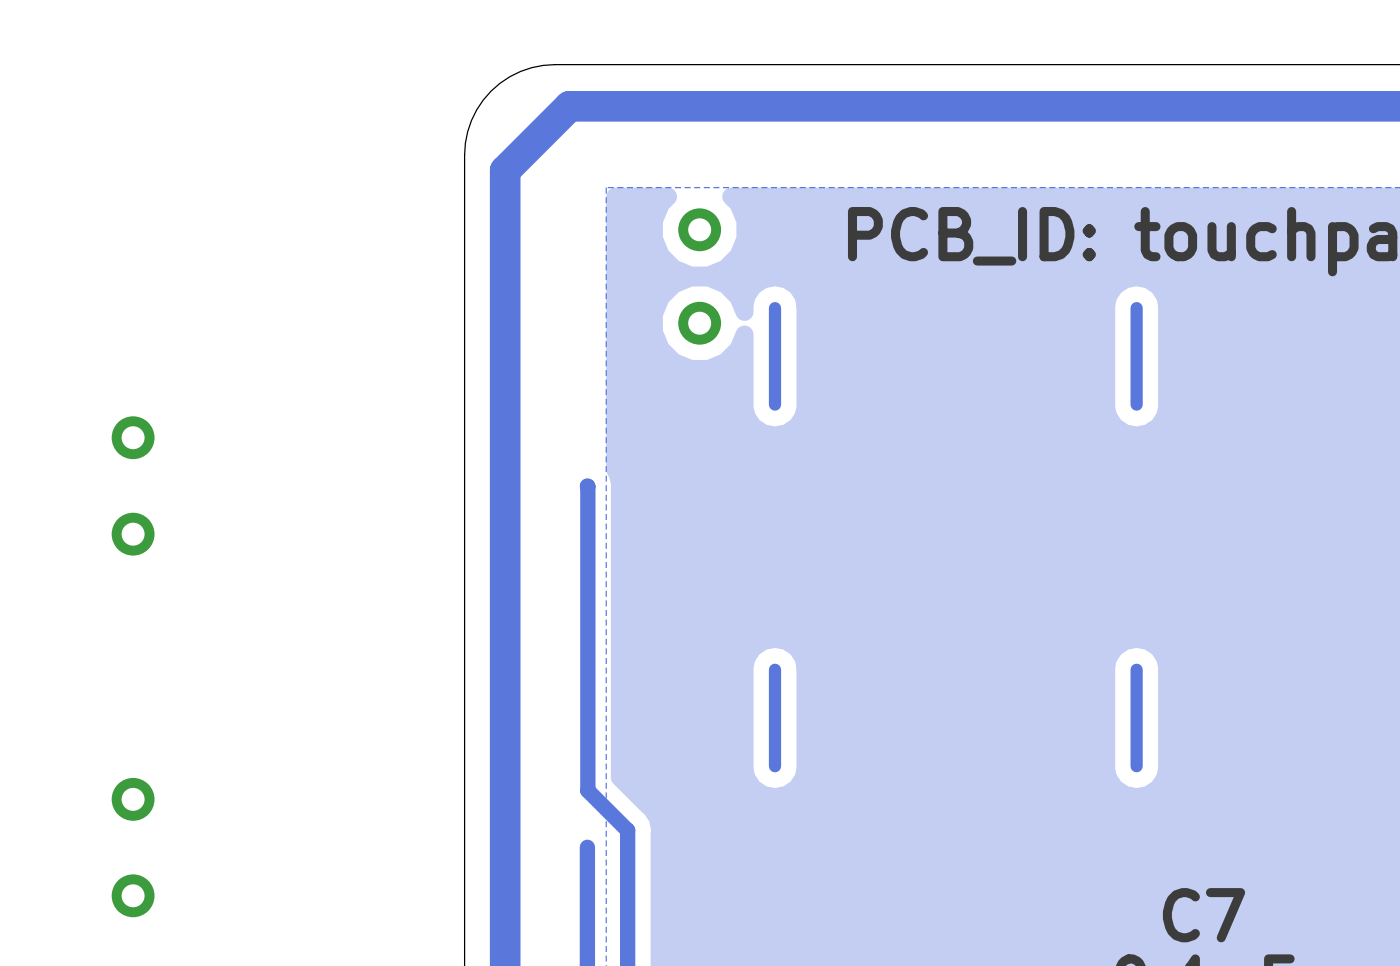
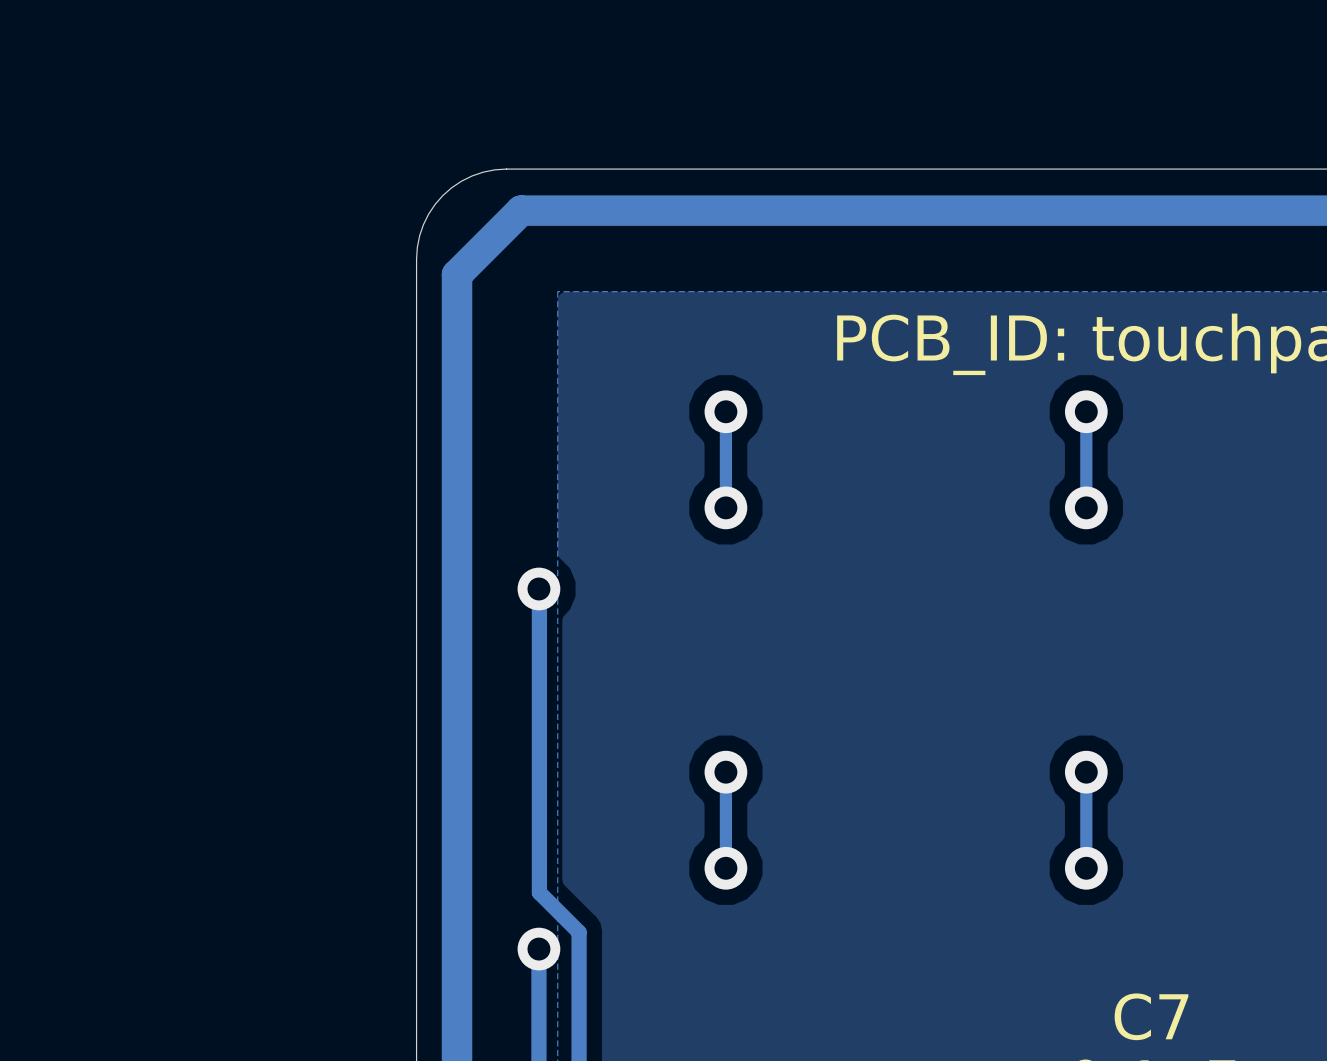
via: (699, 229) -> none
via: none -> (725, 411)
via: none -> (1086, 411)
via: (699, 323) -> none
via: none -> (725, 507)
via: none -> (1086, 507)
via: (133, 437) -> none
via: none -> (538, 589)
via: (133, 534) -> none
via: none -> (725, 772)
via: none -> (1086, 772)
via: none -> (725, 868)
via: none -> (1086, 868)
via: (133, 799) -> none
via: none -> (538, 949)
via: (133, 895) -> none

